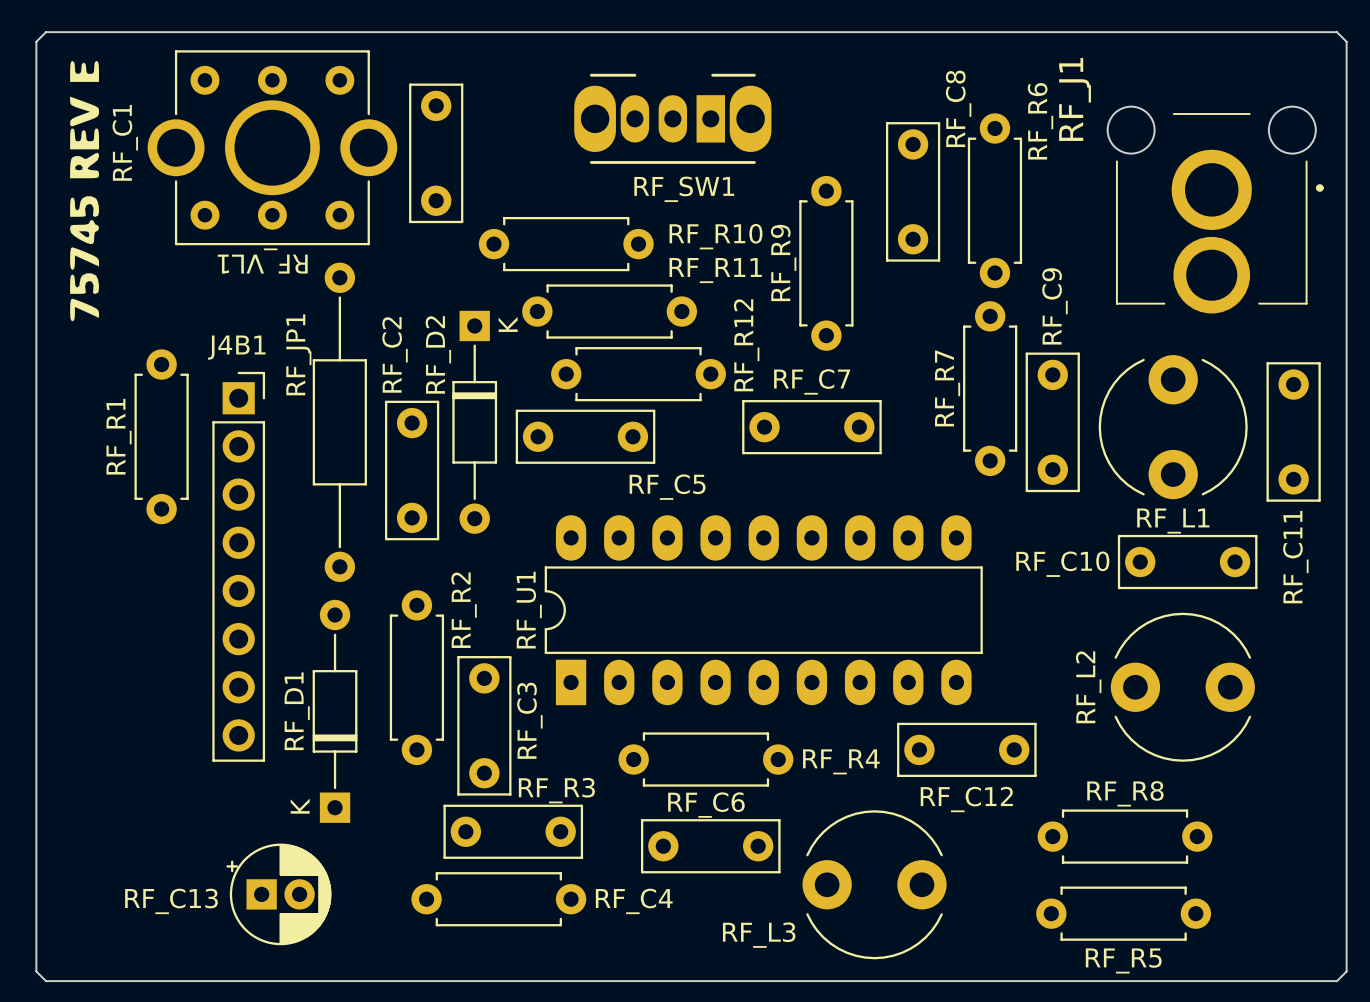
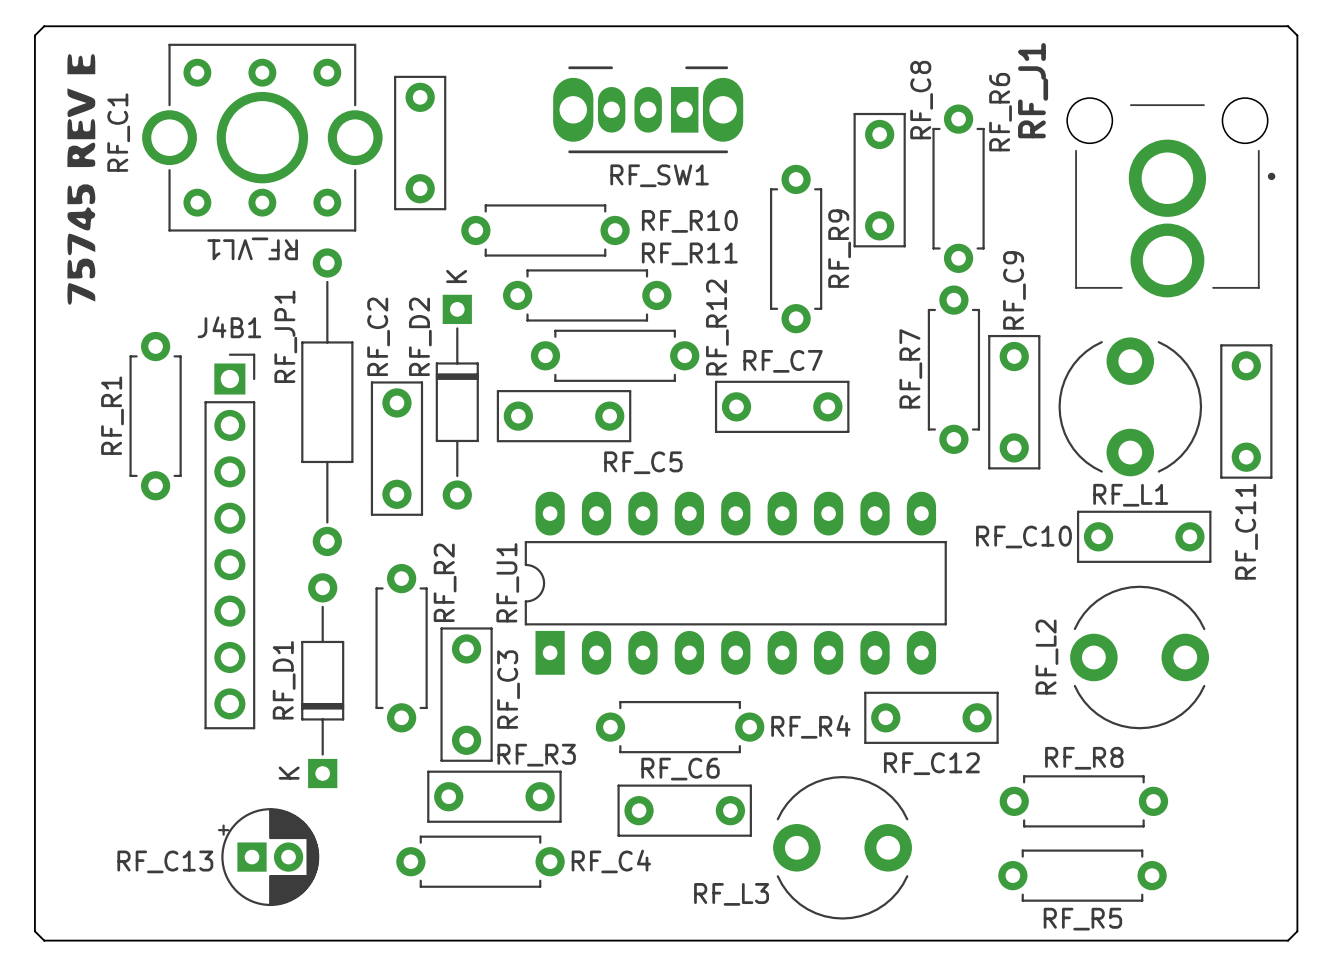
RF_R9 name position: RF_R9 (783, 263) -> RF_R9 (839, 248)
RF_D2 text position: K (508, 324) -> K (456, 276)

